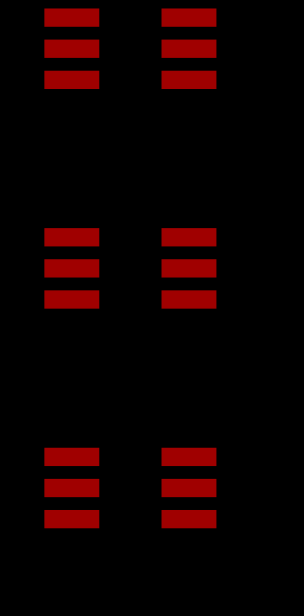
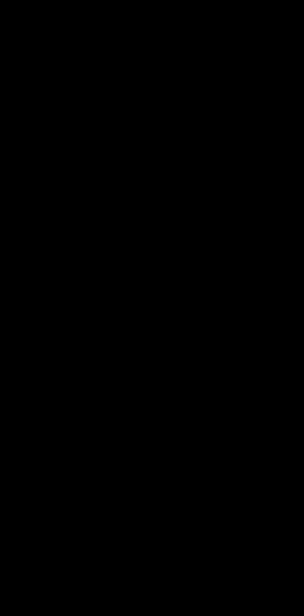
part: (130, 48) -> none
part: (130, 268) -> none
part: (130, 488) -> none

